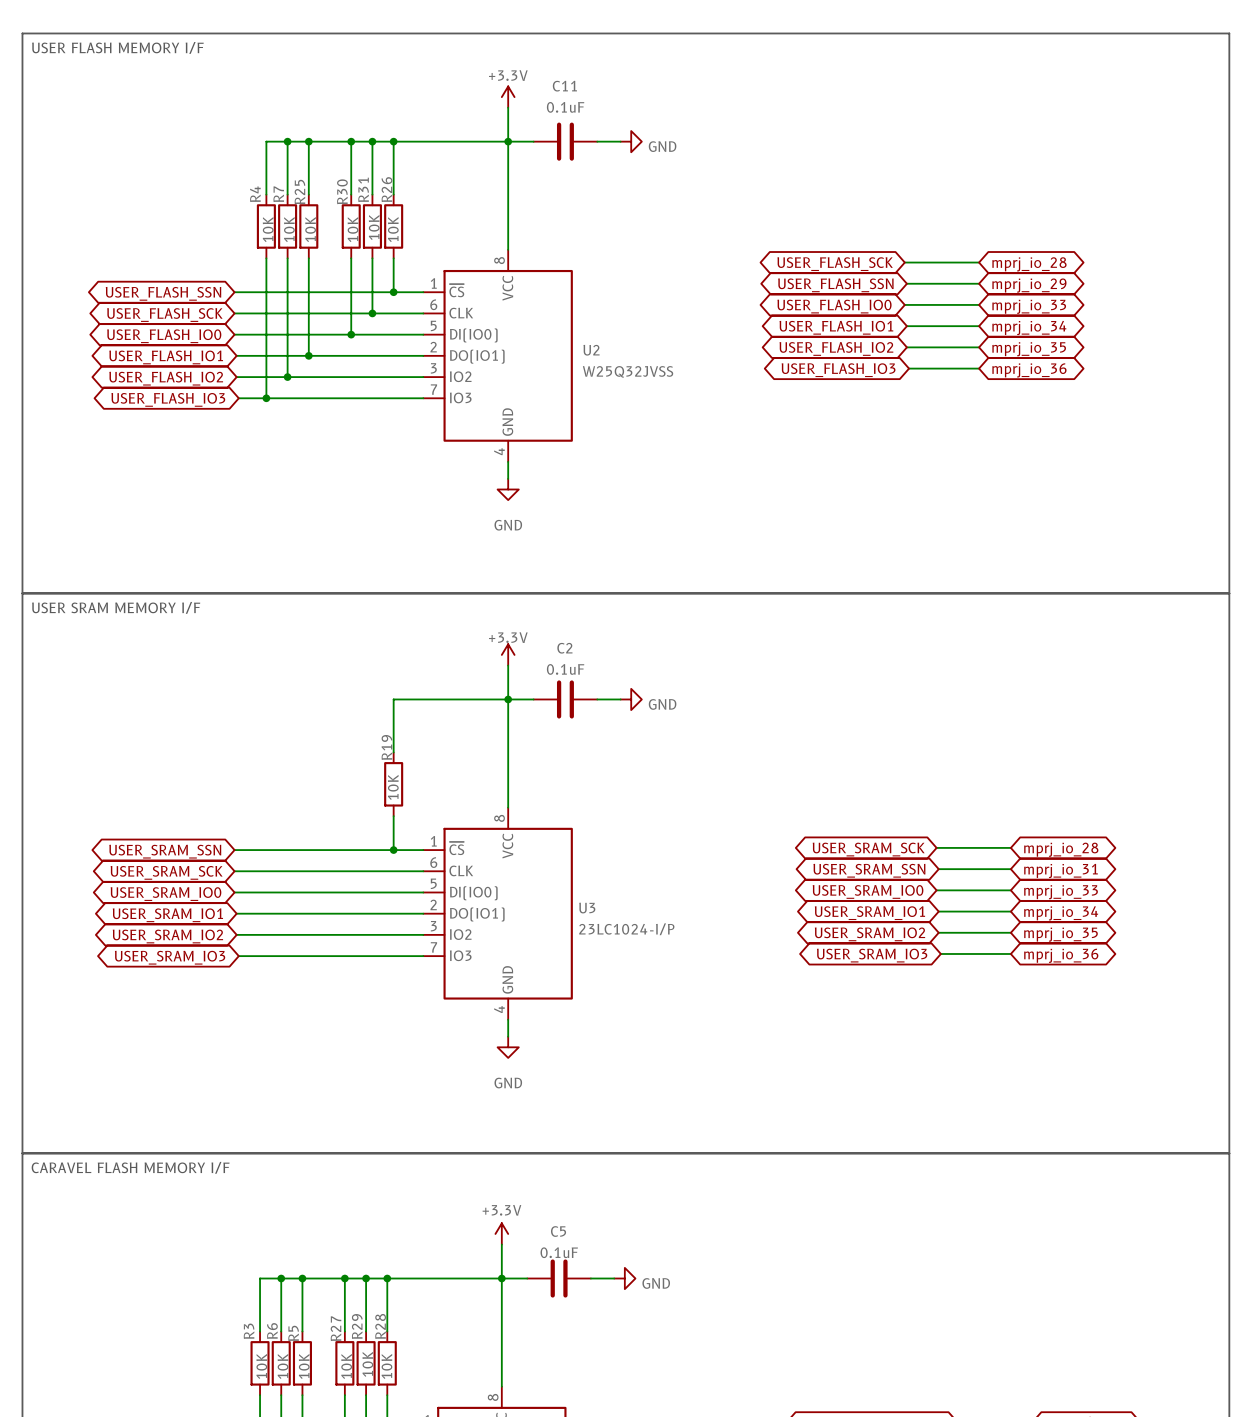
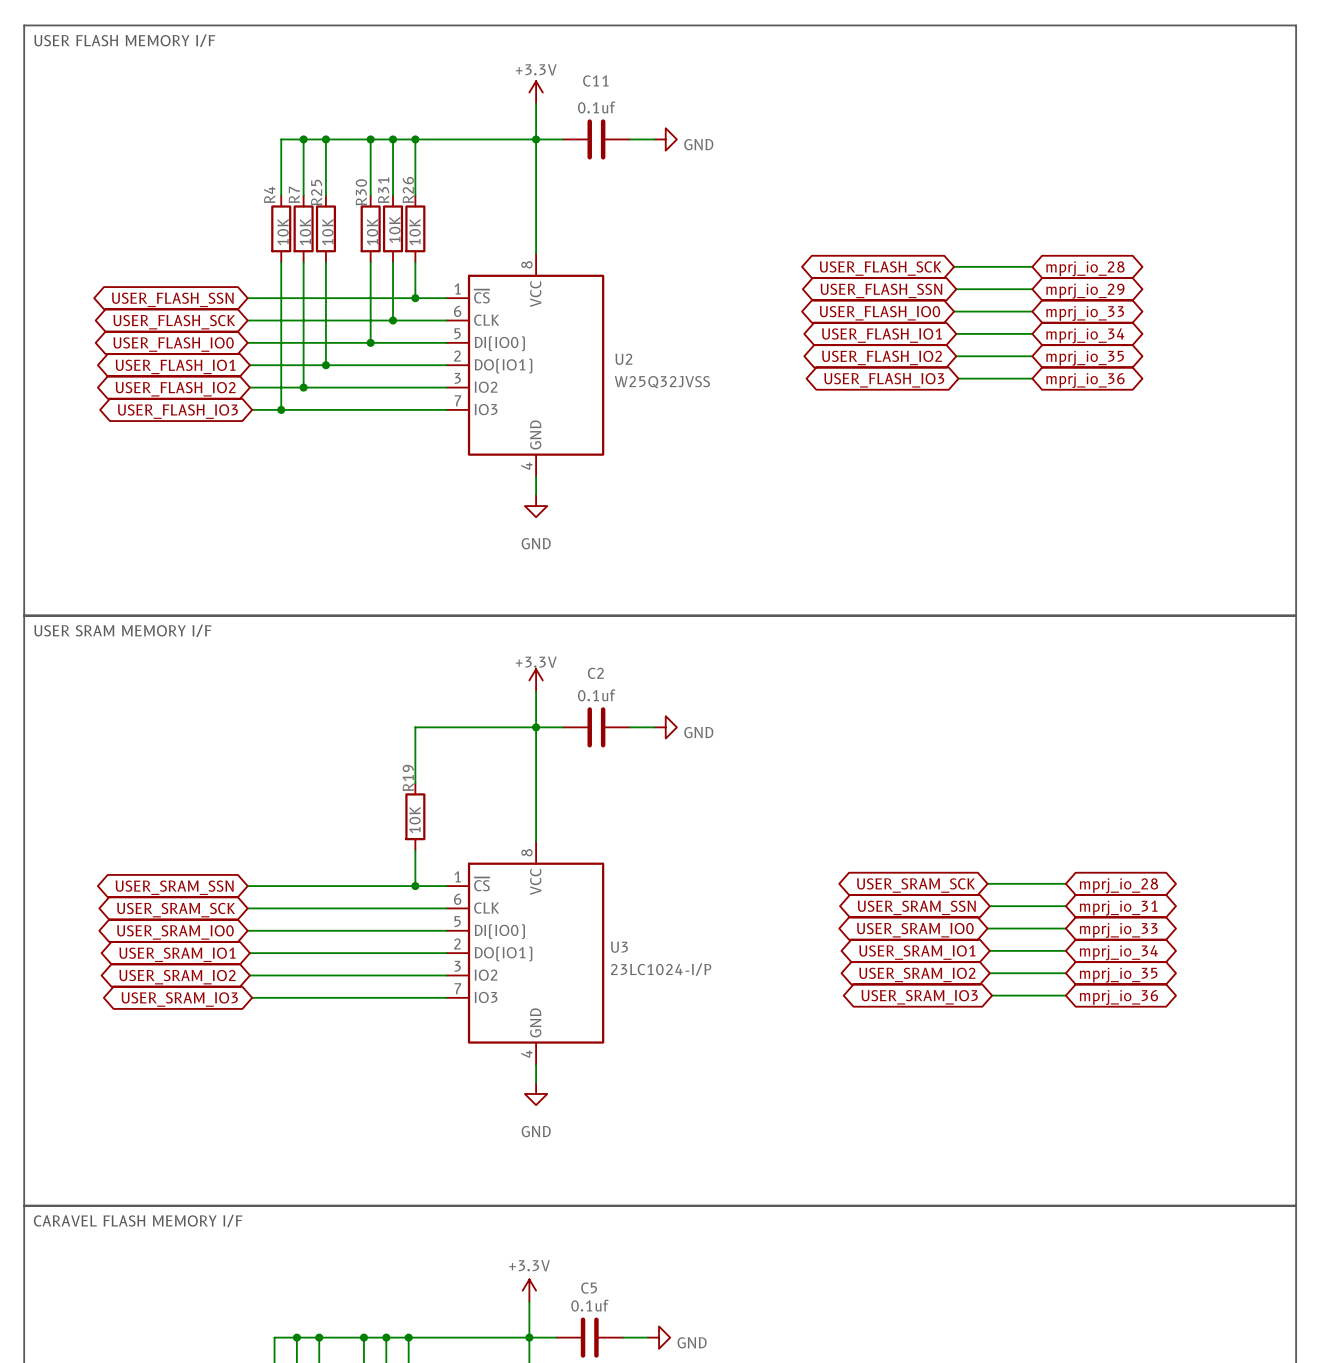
C11 value: 0.1uF (565, 107) -> 0.1uf (596, 107)
C2 value: 0.1uF (565, 669) -> 0.1uf (596, 695)
C5 value: 0.1uF (559, 1252) -> 0.1uf (590, 1305)

